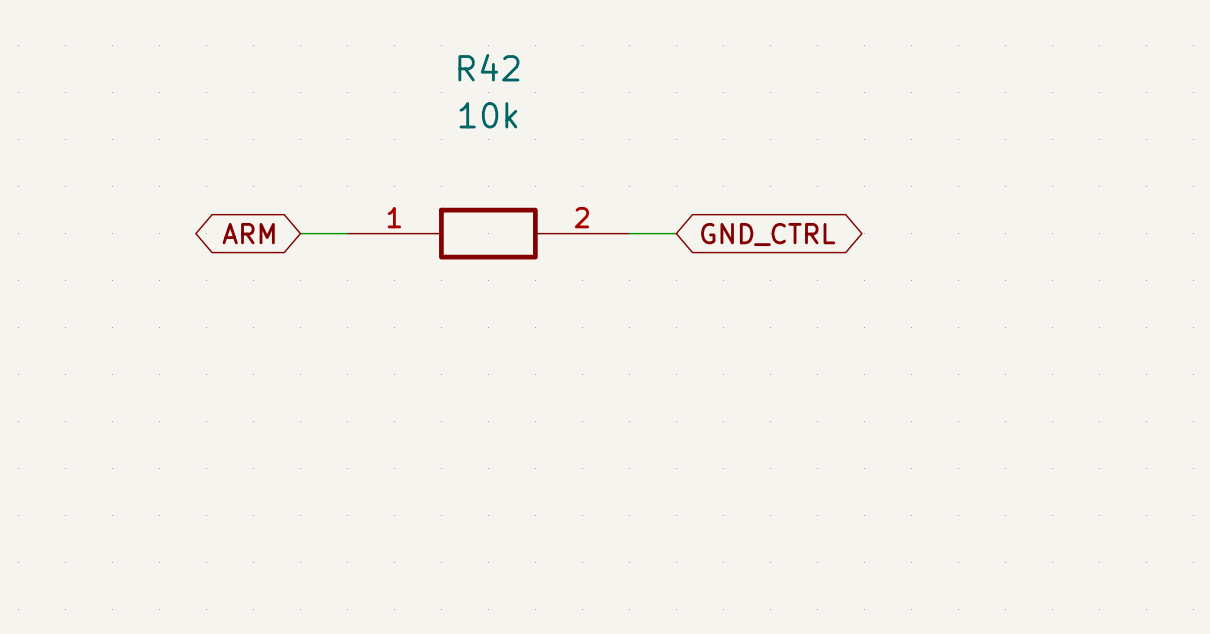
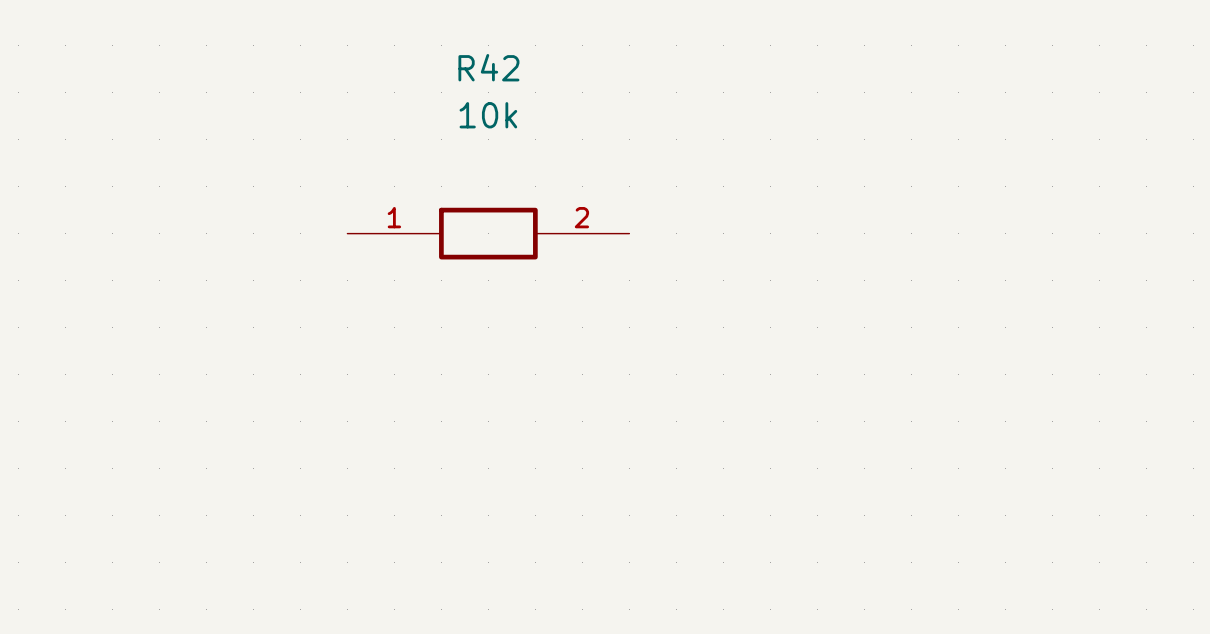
global label: ARM (248, 233) -> none
wire: (300, 233) (347, 233) -> none
wire: (629, 233) (676, 233) -> none
global label: GND_CTRL (768, 234) -> none

